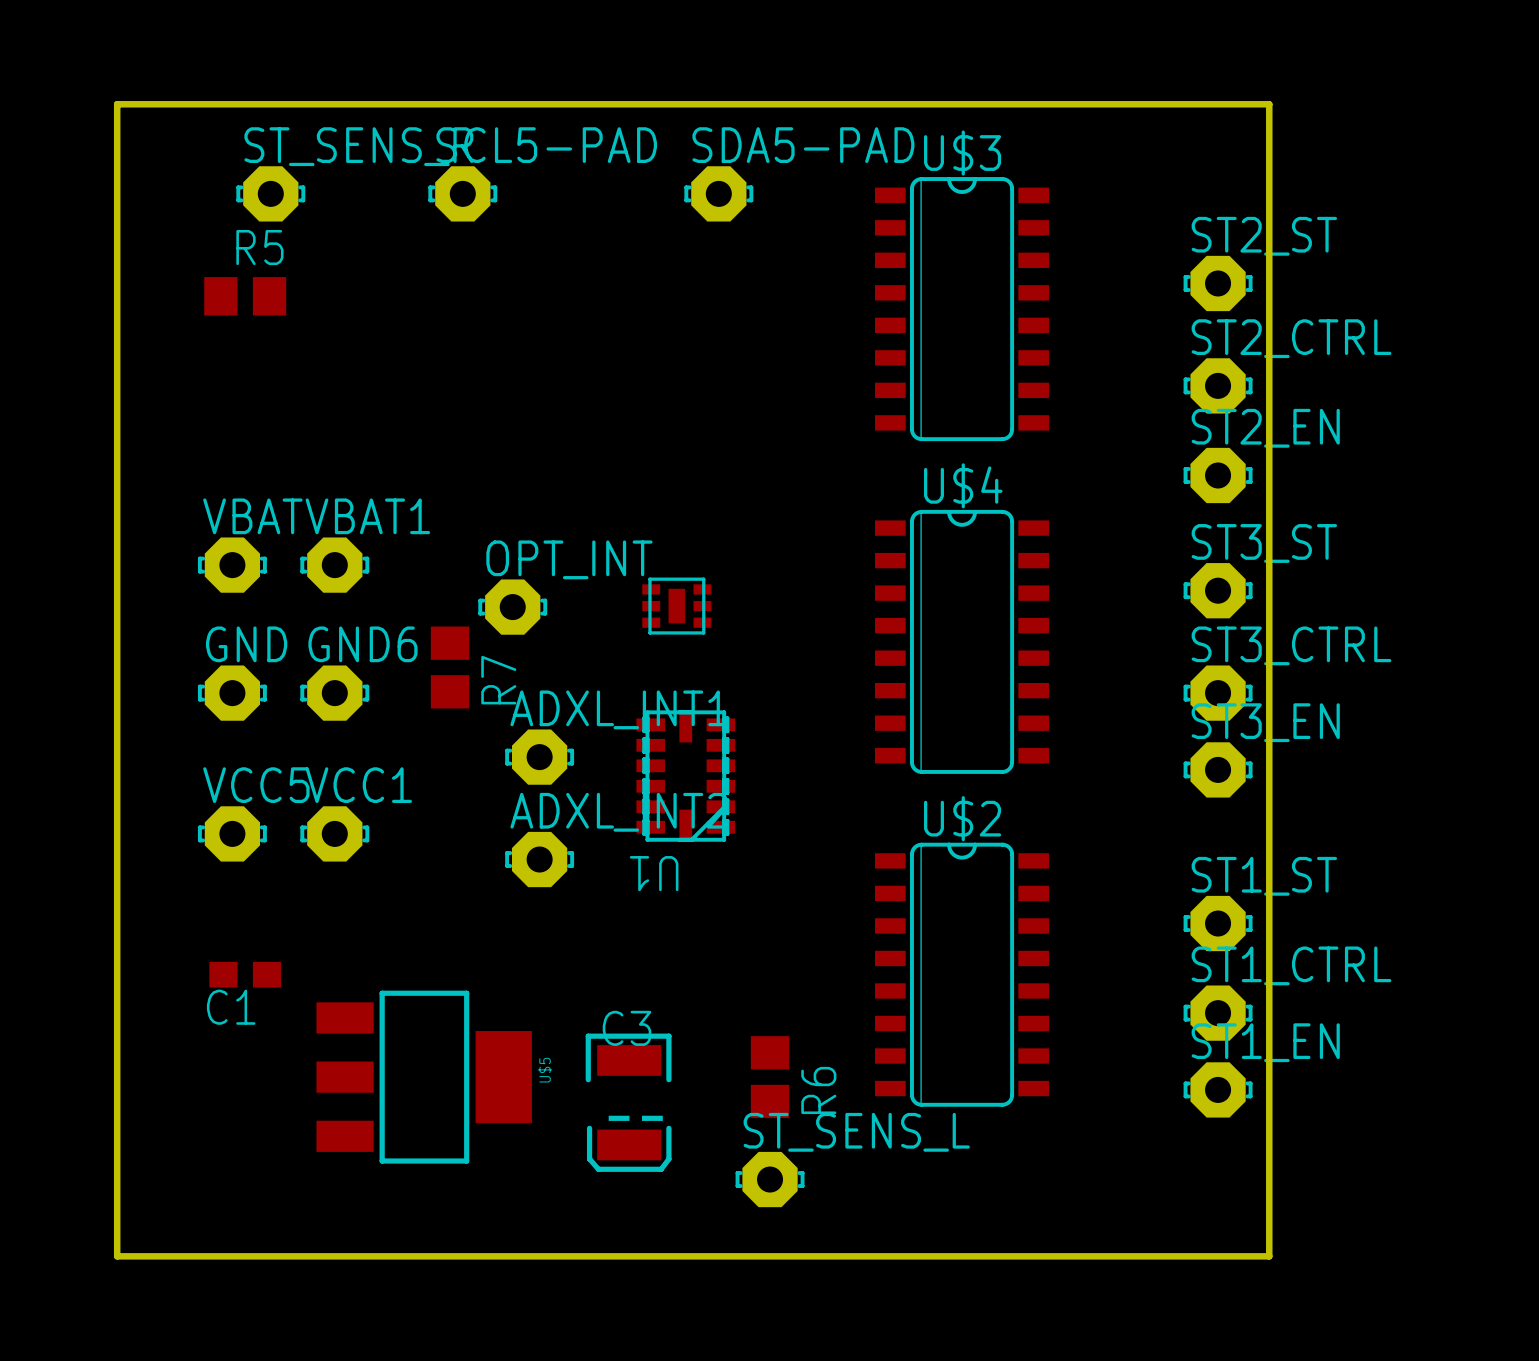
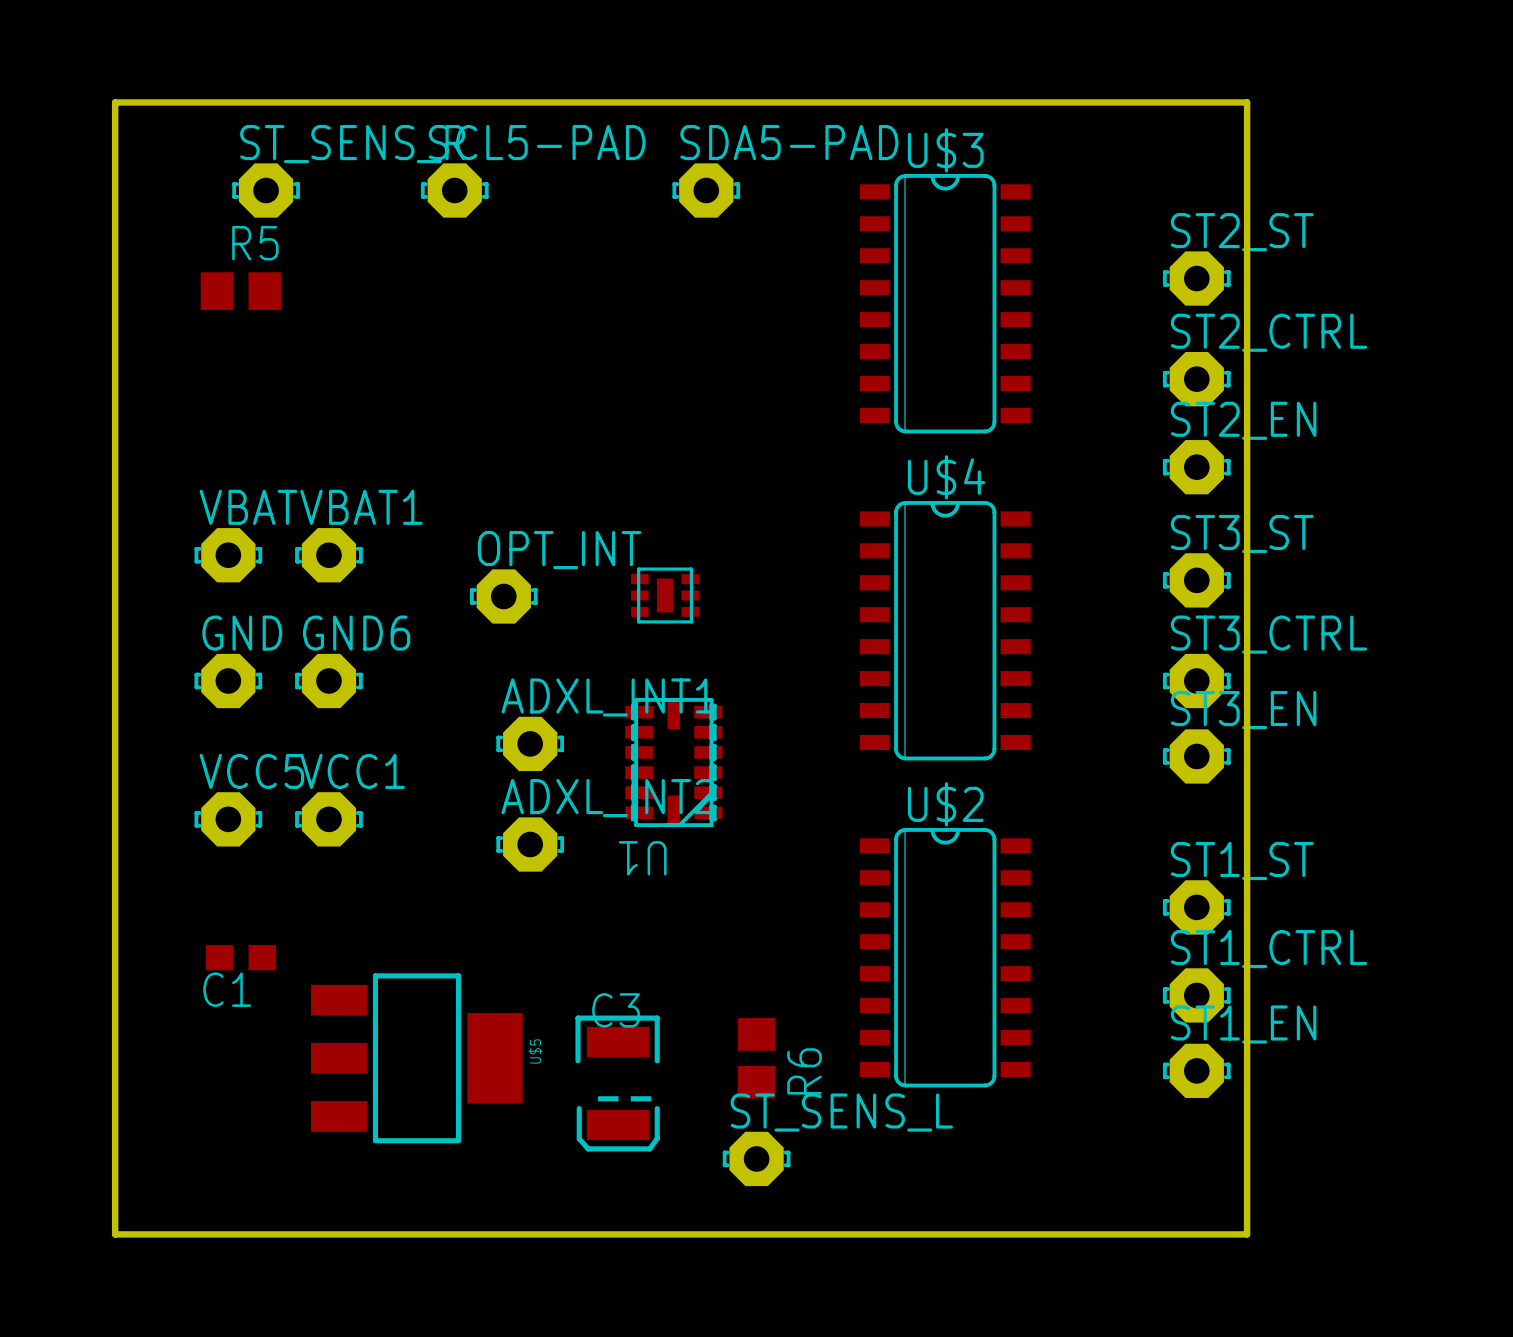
R7: (450, 667) -> none

